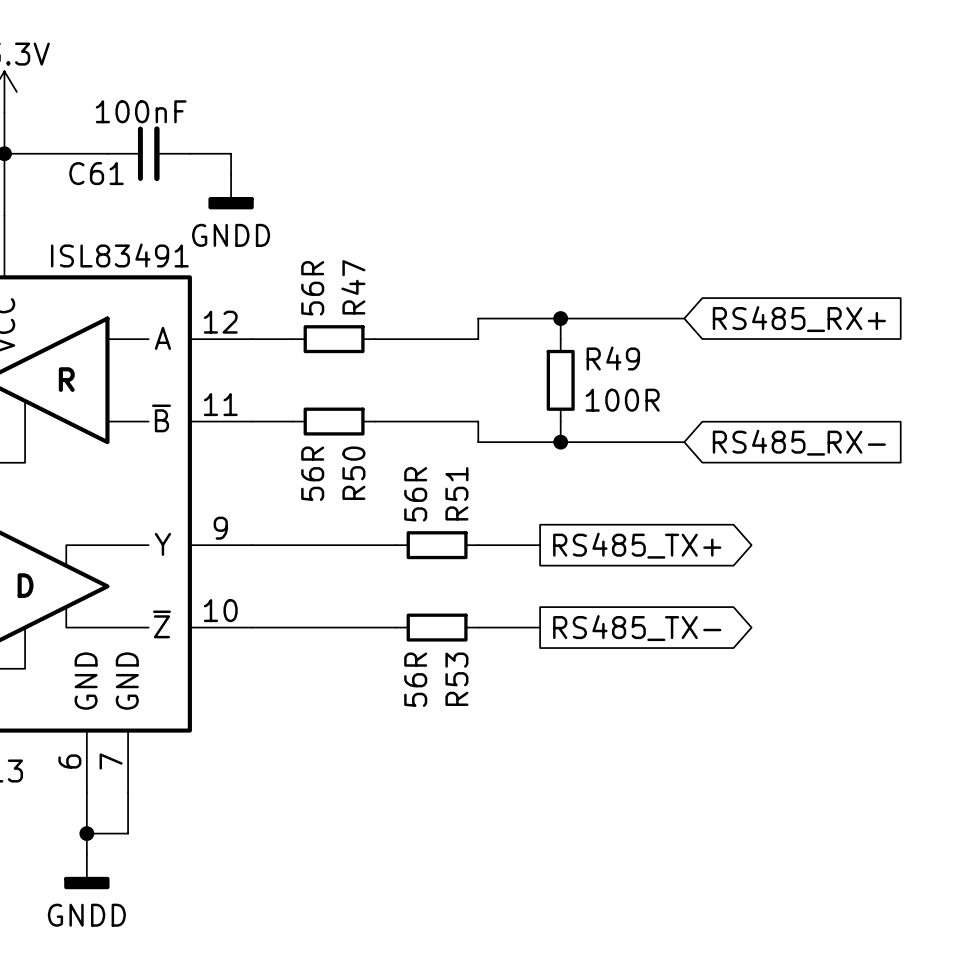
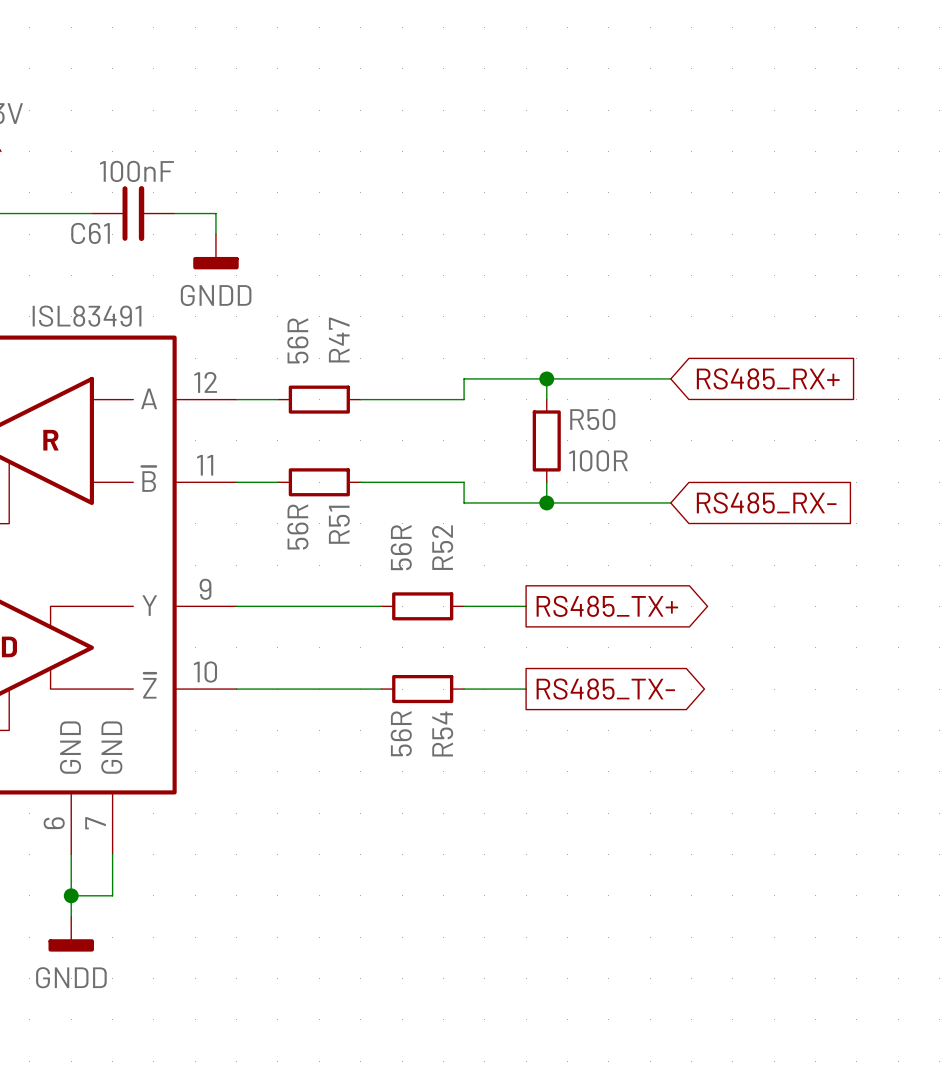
R49 name: R49 (613, 358) -> R50 (592, 419)
R50 name: R50 (353, 473) -> R51 (339, 524)
R51 name: R51 (456, 493) -> R52 (442, 547)
R53 name: R53 (456, 679) -> R54 (442, 734)

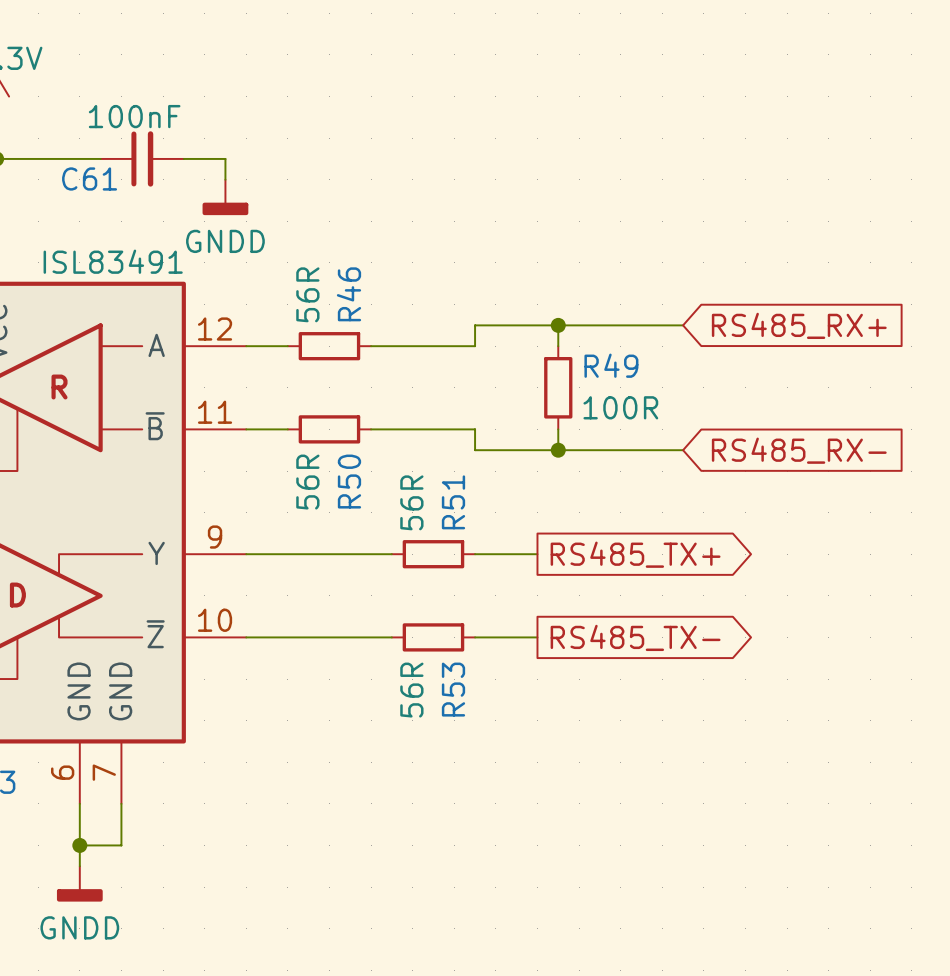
R47 name: R47 (339, 340) -> R46 (348, 294)
R50 name: R50 (592, 419) -> R49 (611, 365)
R51 name: R51 (339, 524) -> R50 (349, 481)
R52 name: R52 (442, 547) -> R51 (453, 502)
R54 name: R54 (442, 734) -> R53 (453, 689)

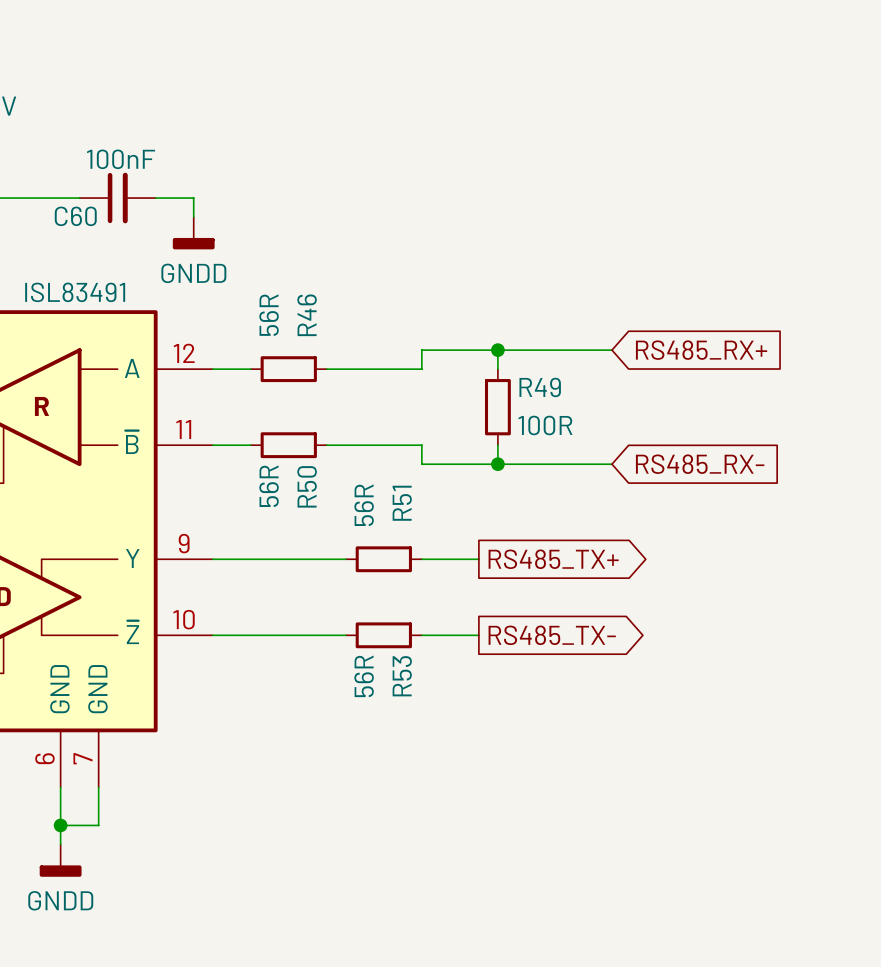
C61 name: C61 (89, 178) -> C60 (75, 216)

